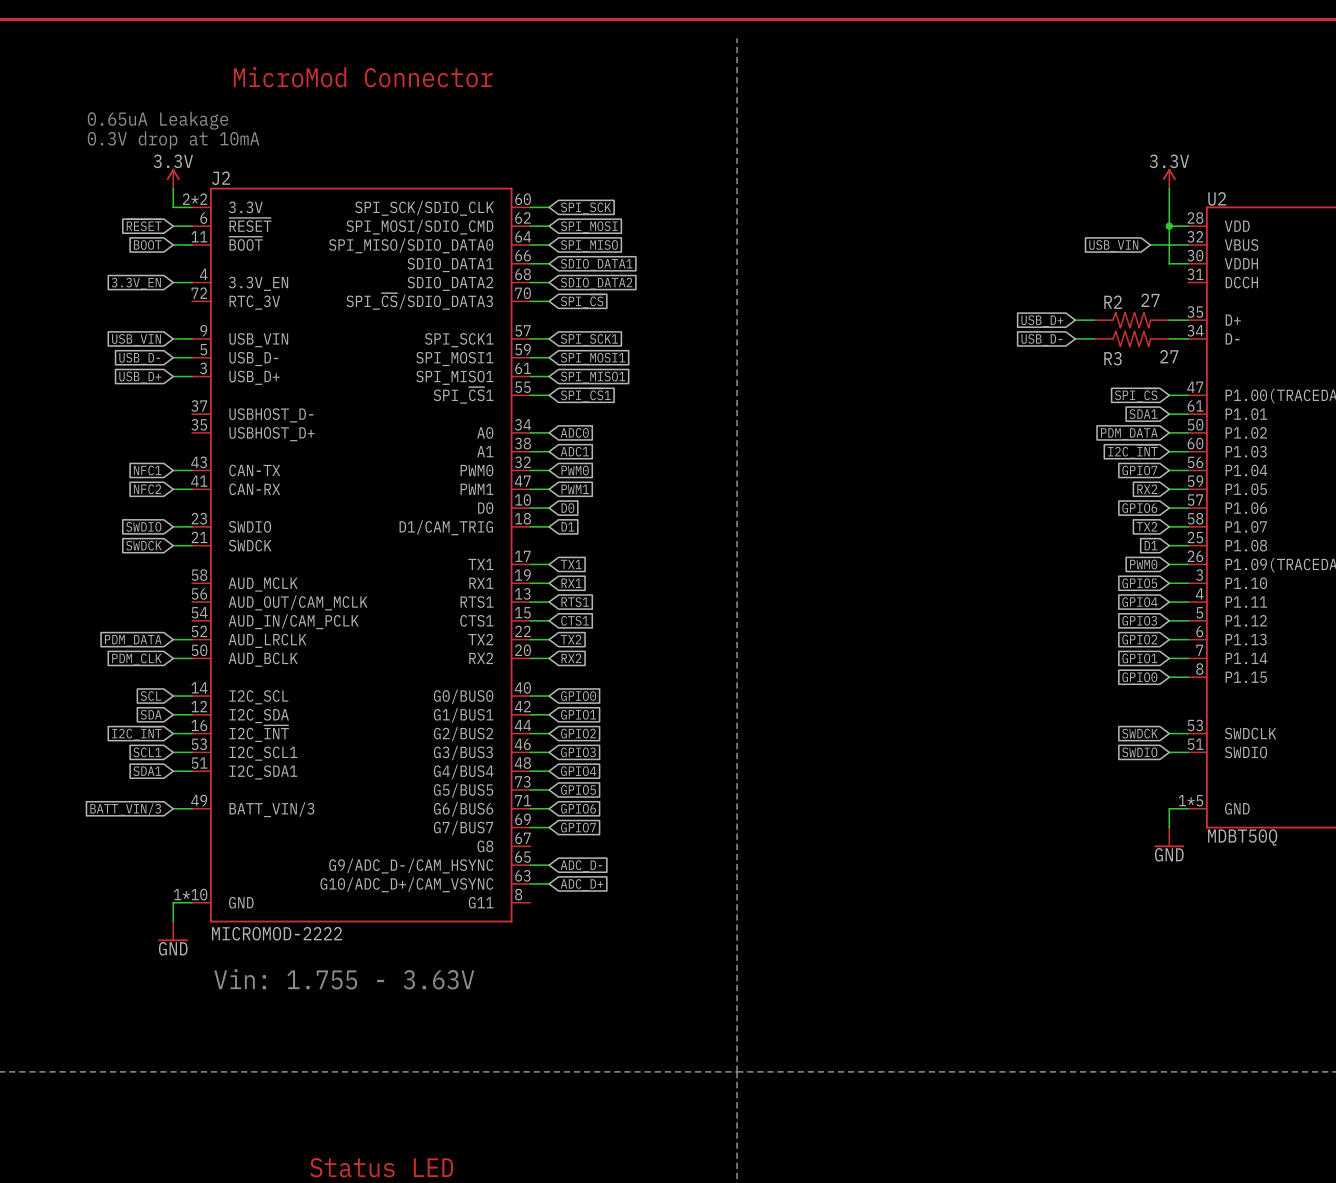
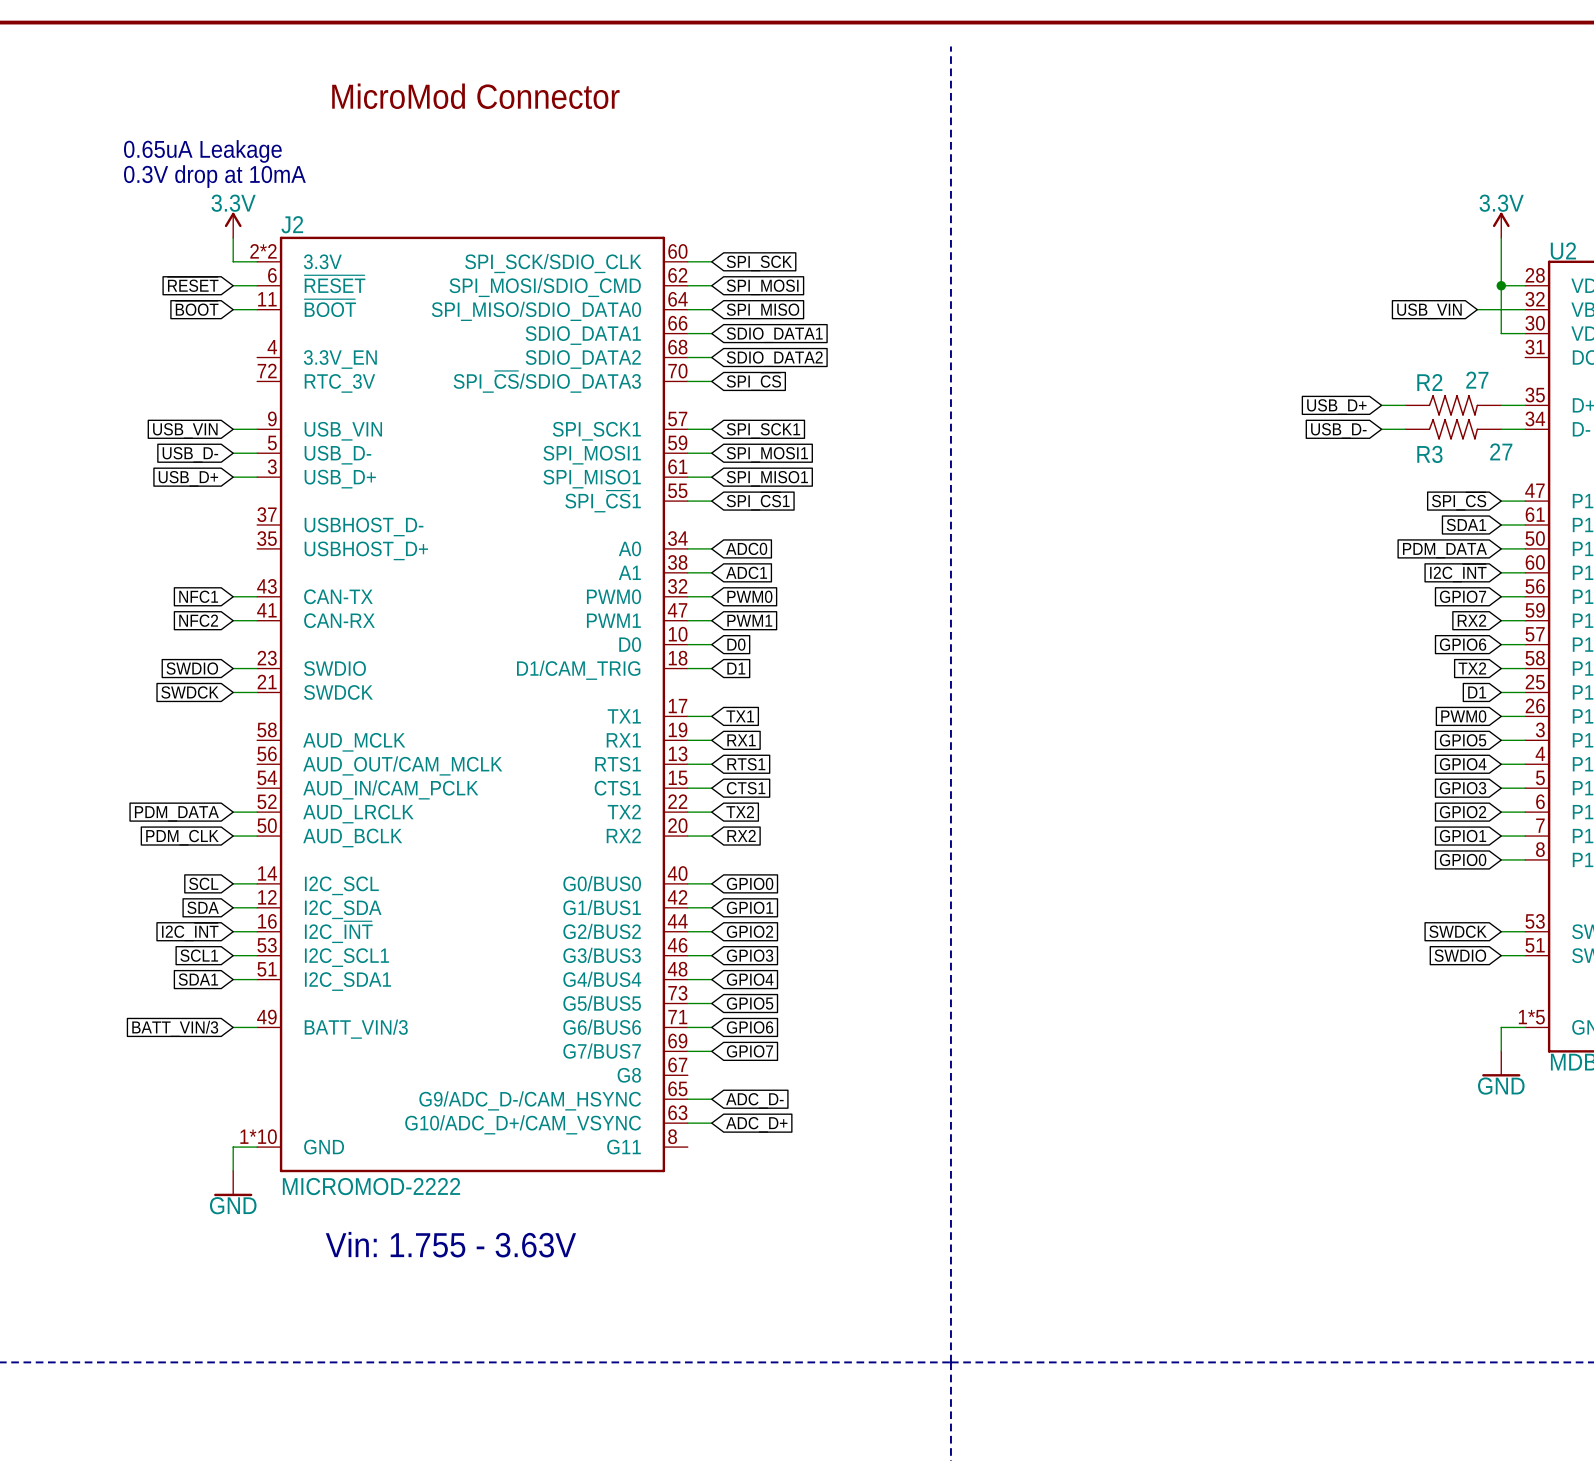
global label: BOOT (147, 244) -> ~{BOOT} (197, 308)
wire: (173, 282) (192, 282) -> none
global label: 3.3V_EN (136, 283) -> none

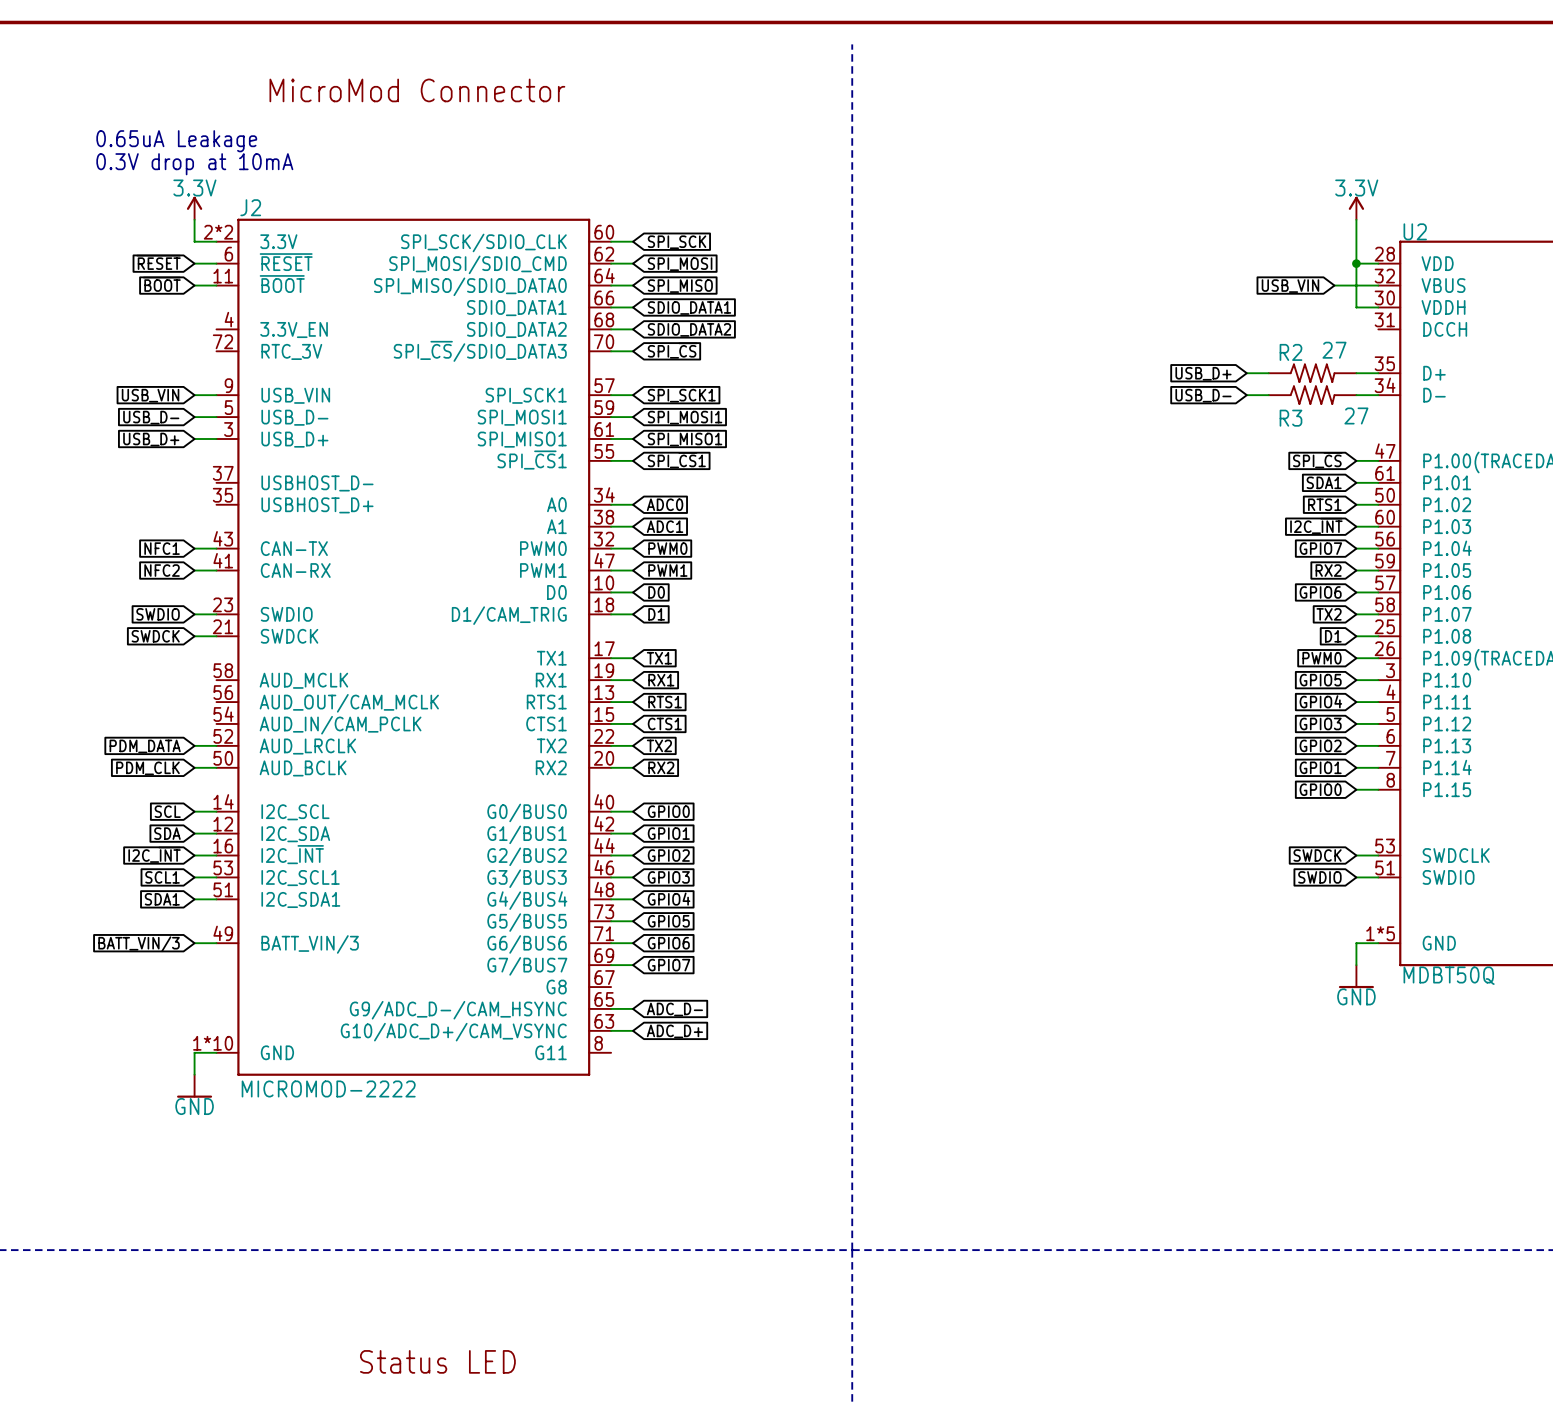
global label: PDM_DATA (1444, 550) -> RTS1 (1324, 504)
text: Vin: 1.755 - 3.63V (450, 1244) -> none

